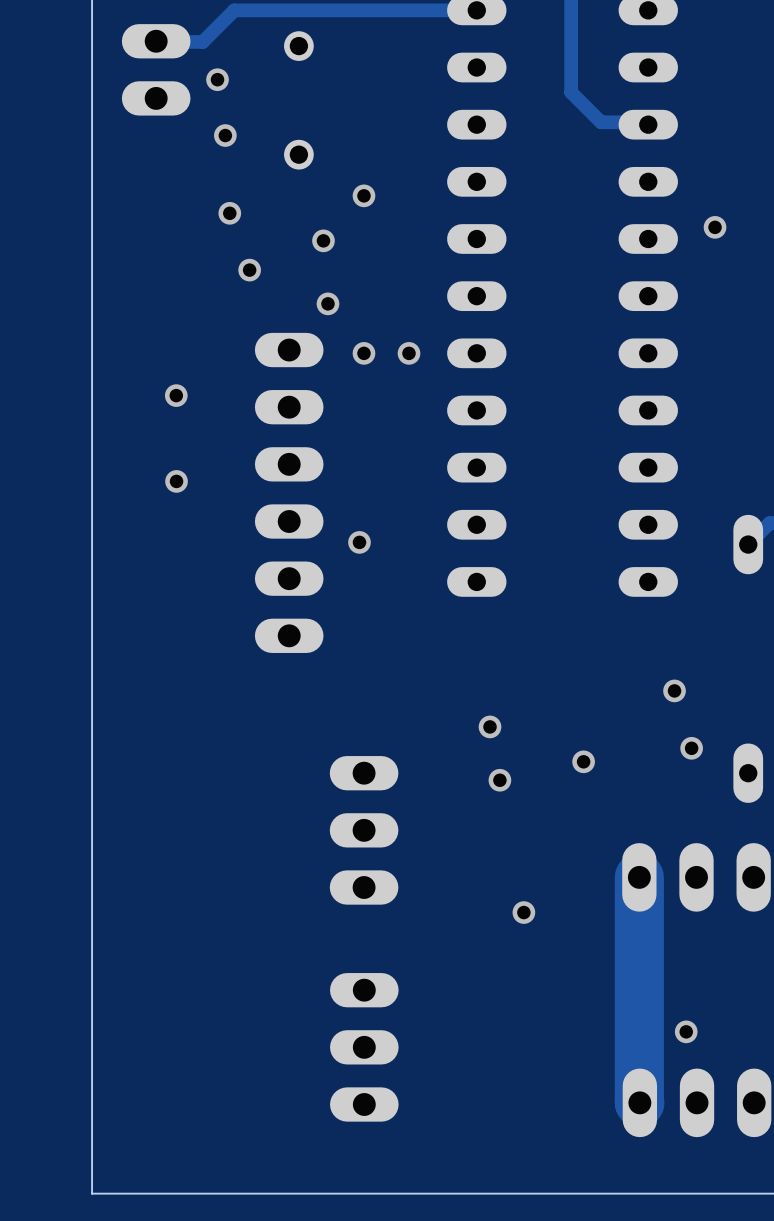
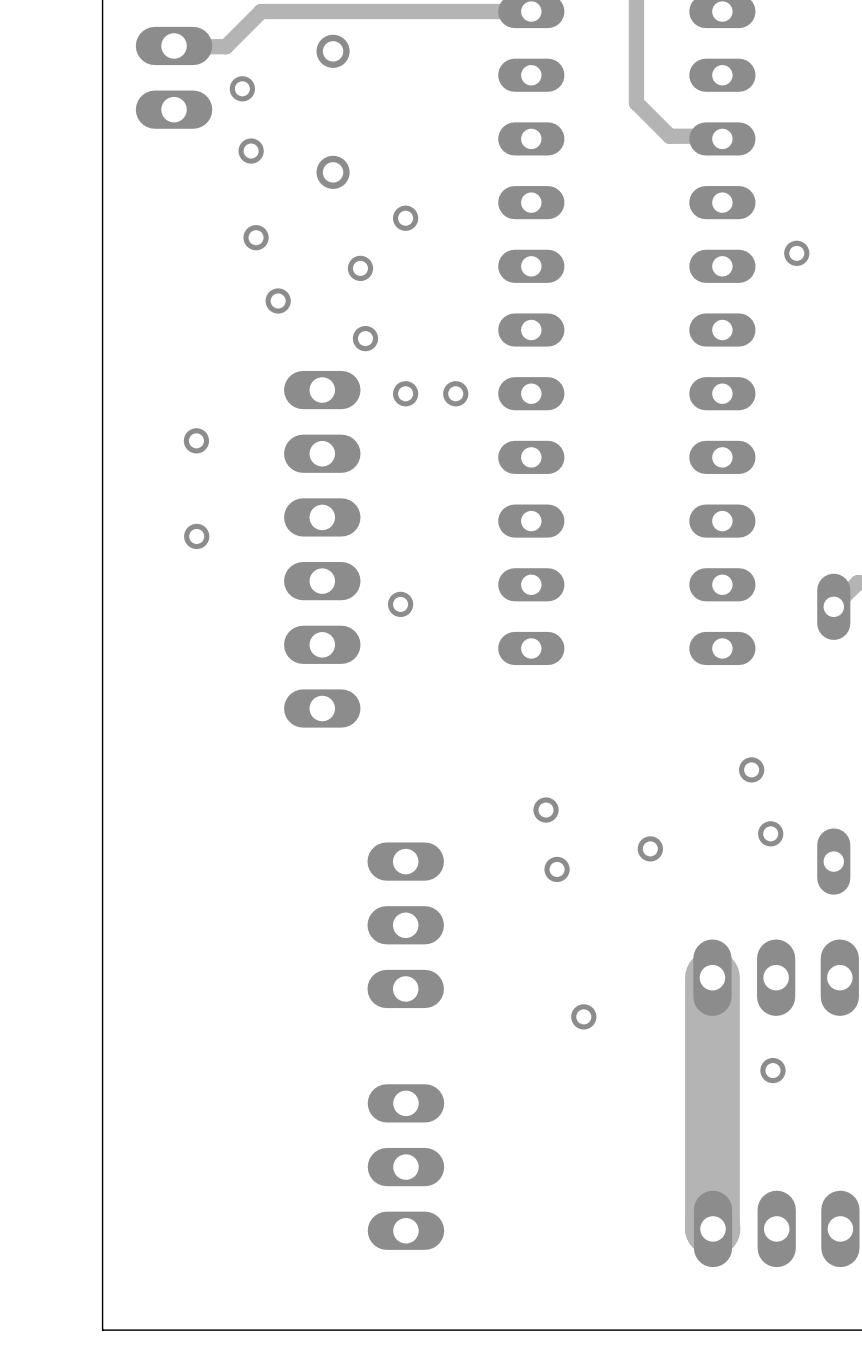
via: none -> (772, 1070)
via: (686, 1031) -> none

